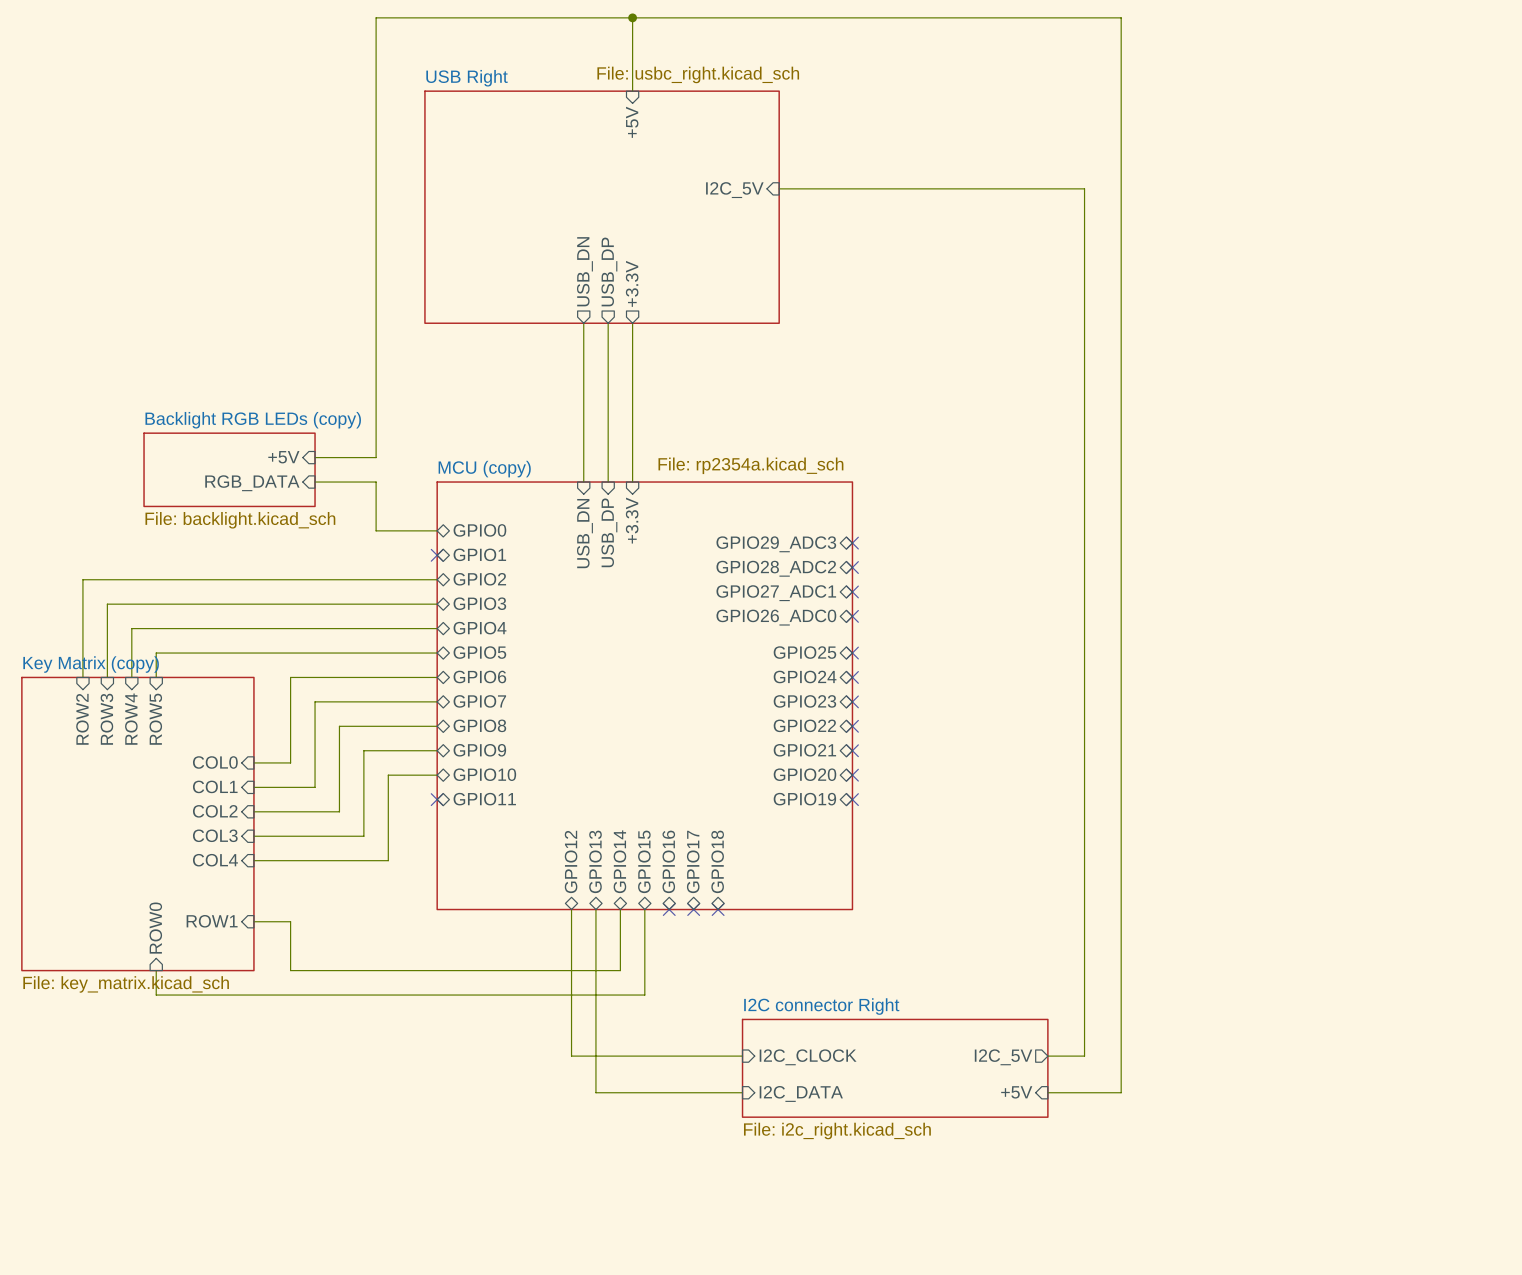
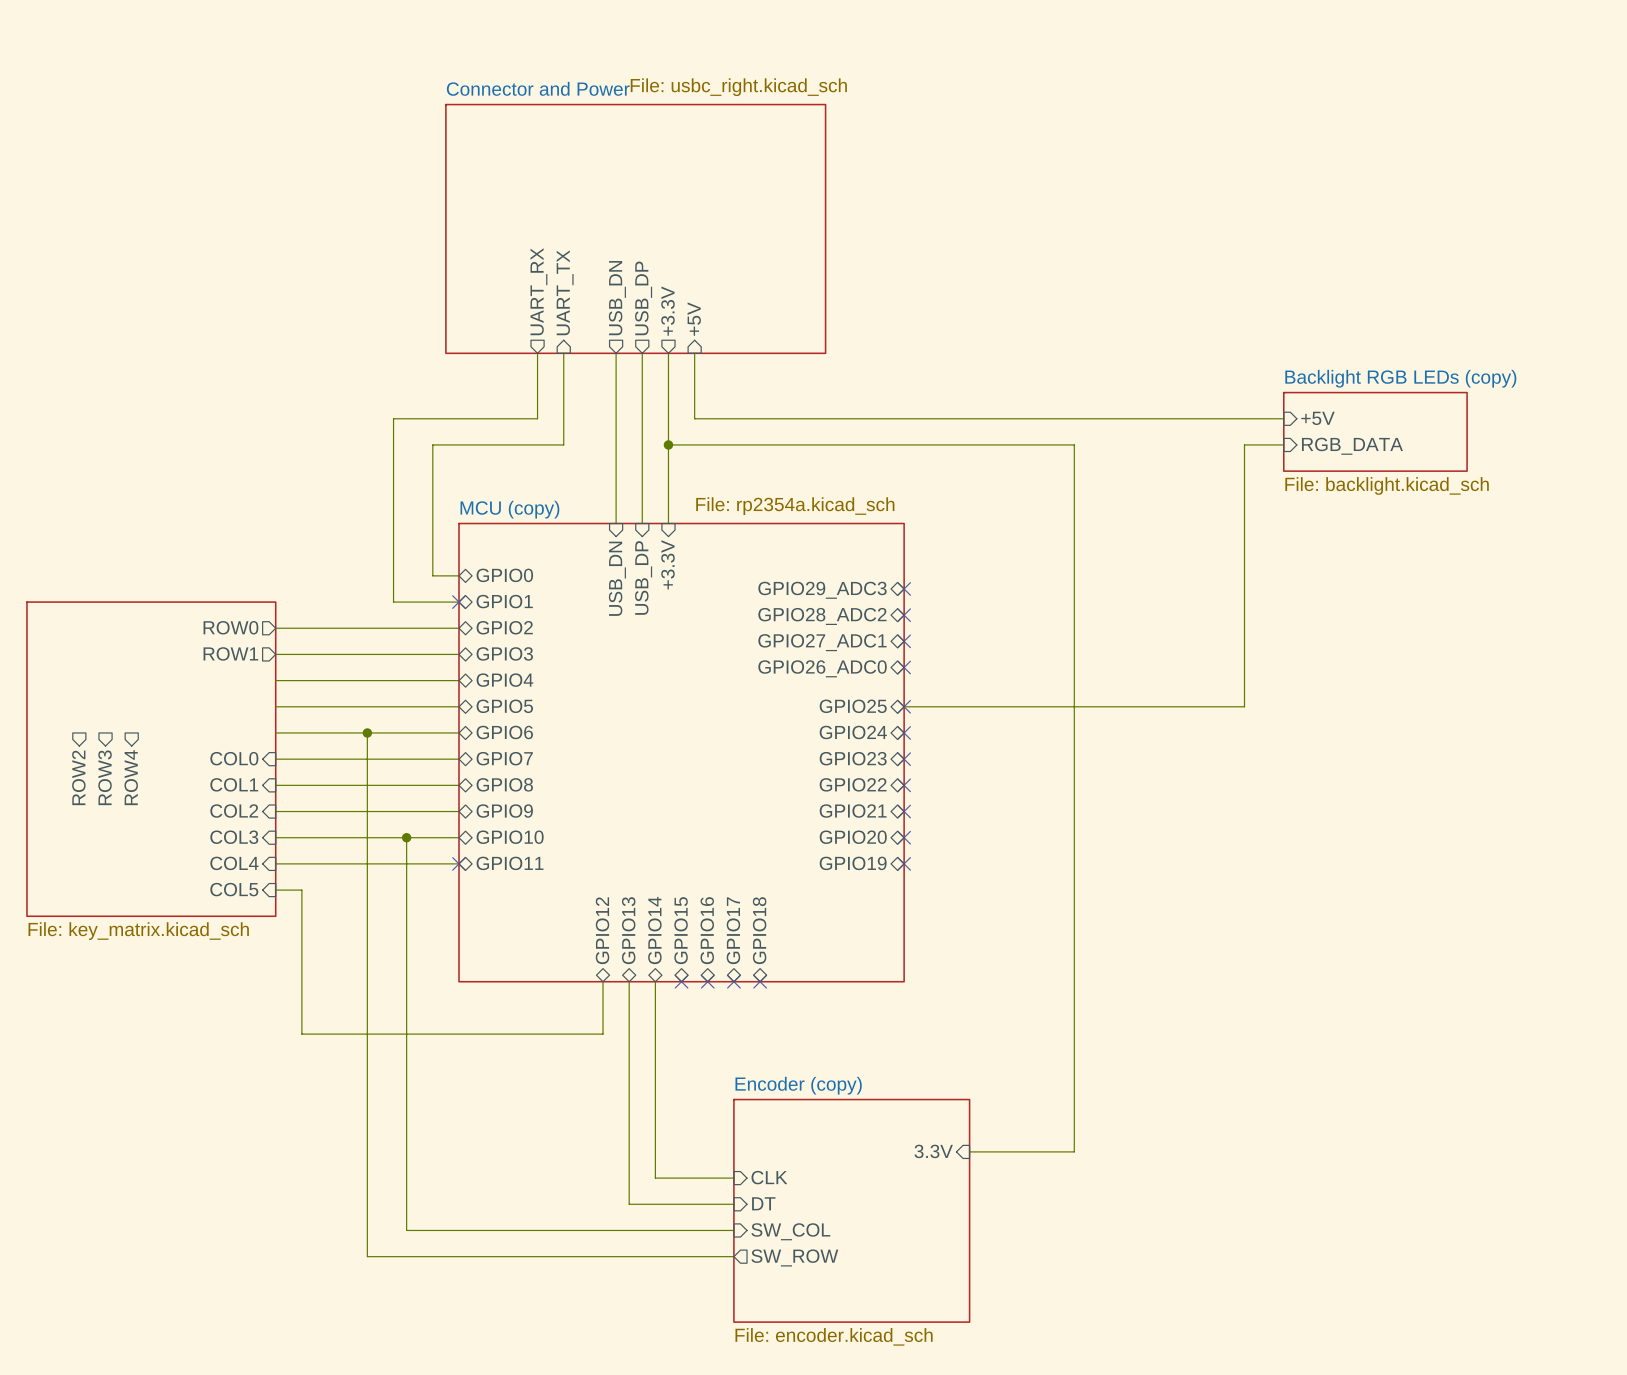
wire: (632, 17) (632, 91) -> none
junction: (632, 17) -> none
sheet USB Right name: USB Right (467, 78) -> Connector and Power (538, 88)
sheet pin: +5V (632, 122) -> none
wire: (779, 188) (1084, 188) (1084, 1056) (1047, 1056) -> none
sheet pin: I2C_5V (734, 190) -> none
sheet pin: none -> UART_RX (538, 291)
sheet pin: none -> UART_TX (565, 292)
sheet pin: none -> +5V (694, 319)
wire: none -> (563, 353) (563, 444) (432, 444) (432, 575)
wire: none -> (694, 353) (694, 418) (1283, 418)
sheet pin: none -> +5V (1318, 418)
wire: (376, 384) (376, 17) (1121, 17) (1121, 1092) (1047, 1092) -> (393, 418) (537, 418) (537, 353)
sheet Backlight RGB LEDs (copy): none -> File: backlight.kicad_sch (1375, 431)
wire: none -> (668, 444) (1074, 444) (1074, 1151) (969, 1151)
junction: none -> (668, 444)
wire: none -> (1283, 444) (1244, 444) (1244, 706) (904, 706)
sheet pin: none -> RGB_DATA (1352, 446)
sheet pin: +5V (283, 457) -> none
wire: (315, 457) (376, 457) -> (393, 523) (393, 497)
sheet Backlight RGB LEDs (copy): File: backlight.kicad_sch (229, 469) -> none
wire: (315, 482) (376, 482) -> none
sheet pin: RGB_DATA (252, 483) -> none
wire: (376, 530) (412, 530) -> (393, 575) (393, 602) (459, 602)
sheet pin: none -> ROW0 (230, 627)
wire: (266, 579) (82, 579) (82, 677) -> none
sheet pin: none -> ROW1 (230, 653)
wire: (266, 604) (107, 604) (107, 677) -> none
wire: (266, 628) (131, 628) (131, 677) -> none
wire: (266, 653) (156, 653) (156, 677) -> none
wire: (290, 677) (290, 762) (253, 762) -> (301, 732) (275, 732)
wire: none -> (367, 732) (367, 1256) (733, 1256)
junction: none -> (367, 732)
sheet: none -> File: key_matrix.kicad_sch (151, 759)
wire: (315, 701) (315, 787) (253, 787) -> (328, 759) (275, 759)
sheet pin: ROW5 (155, 719) -> none
wire: (339, 726) (339, 811) (253, 811) -> (354, 785) (275, 785)
wire: (363, 750) (363, 836) (253, 836) -> (380, 811) (275, 811)
sheet pin position: COL0 (215, 762) -> COL0 (234, 758)
wire: none -> (275, 837) (406, 837)
junction: none -> (406, 837)
sheet pin position: COL1 (215, 786) -> COL1 (234, 784)
wire: none -> (275, 863) (459, 863)
sheet pin position: COL2 (215, 811) -> COL2 (234, 811)
sheet pin: none -> COL5 (234, 889)
sheet Key Matrix (copy): File: key_matrix.kicad_sch (137, 824) -> none
sheet pin position: COL3 (215, 835) -> COL3 (234, 837)
sheet pin position: COL4 (215, 860) -> COL4 (234, 863)
wire: (253, 860) (388, 860) -> (733, 1230) (406, 1230) (406, 929)
wire: (644, 909) (644, 995) (156, 995) (156, 970) -> none
no-connect mark: none -> (681, 981)
sheet pin: ROW1 (212, 921) -> none
wire: (253, 921) (290, 921) -> (275, 890) (301, 890) (301, 994)
sheet pin: ROW0 (155, 928) -> none
wire: (290, 958) (290, 970) (620, 970) -> (301, 1034) (603, 1034)
wire: (571, 958) (571, 1056) (742, 1056) -> none
wire: none -> (655, 1047) (655, 1178)
sheet pin: I2C_CLOCK (808, 1057) -> none
sheet pin: I2C_5V (1003, 1057) -> none
sheet pin: none -> 3.3V (933, 1151)
sheet I2C connector Right: File: i2c_right.kicad_sch (895, 1068) -> none
wire: (595, 1092) (620, 1092) -> (629, 1178) (629, 1204) (733, 1204)
wire: (693, 1092) (742, 1092) -> none
sheet pin: none -> CLK (769, 1177)
sheet pin: +5V (1016, 1092) -> none
sheet pin: I2C_DATA (801, 1093) -> none
sheet pin: none -> DT (763, 1203)
sheet Encoder (copy): none -> File: encoder.kicad_sch (851, 1210)
sheet pin: none -> SW_COL (790, 1231)
sheet pin: none -> SW_ROW (794, 1257)

